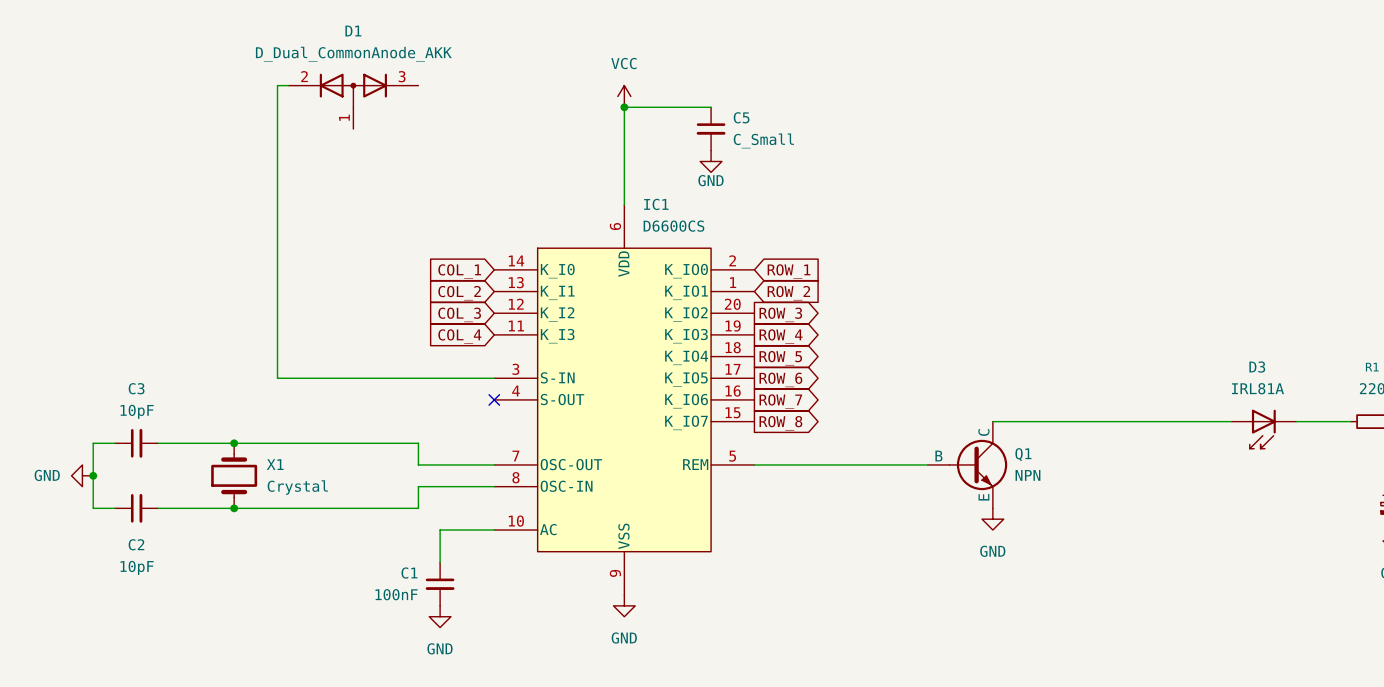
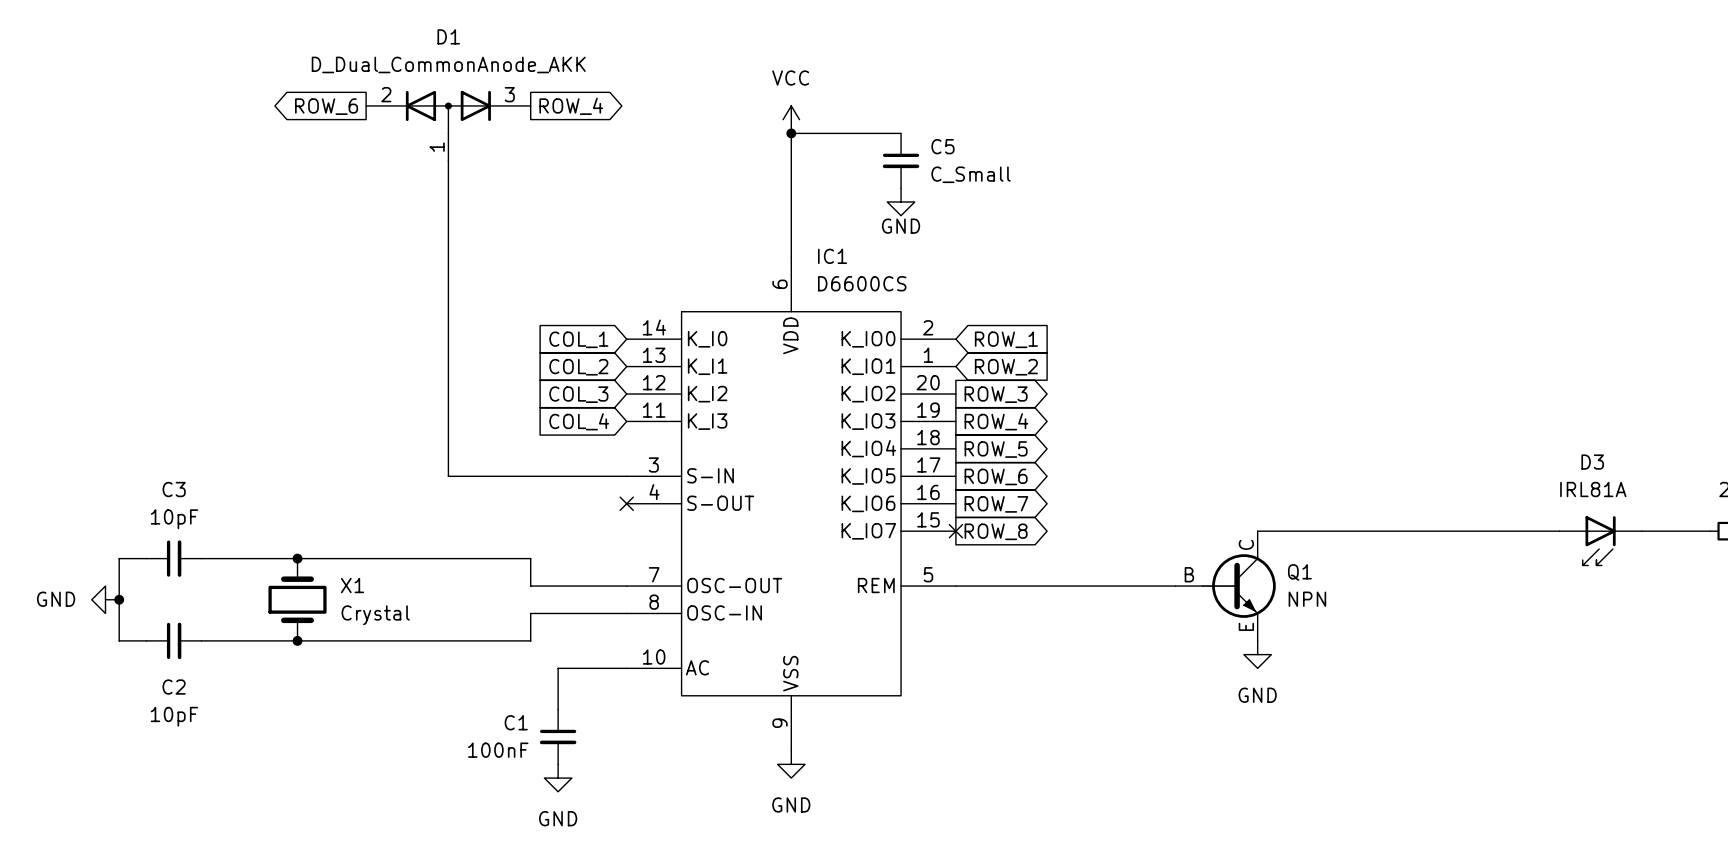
wire: (288, 85) (277, 85) (277, 378) (353, 378) -> (448, 160) (448, 476)
global label: none -> ROW_6 (326, 106)
global label: none -> ROW_4 (571, 106)
no-connect mark: none -> (955, 531)

